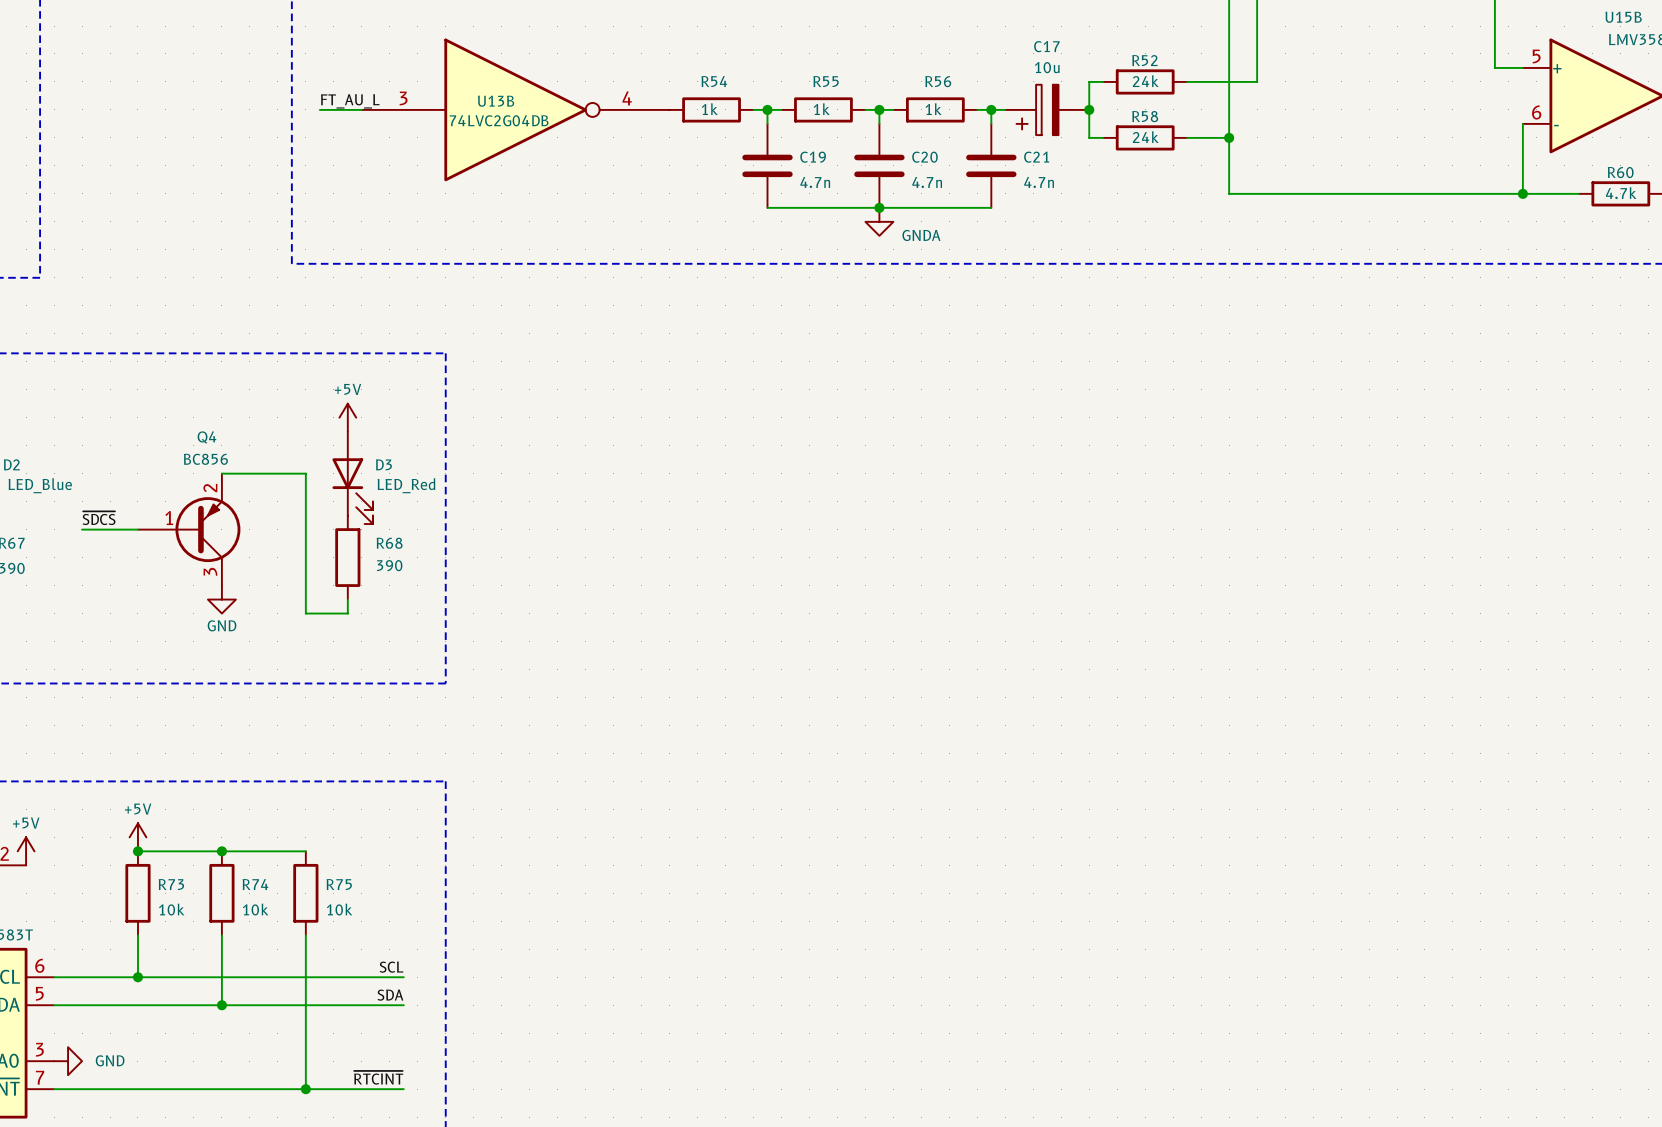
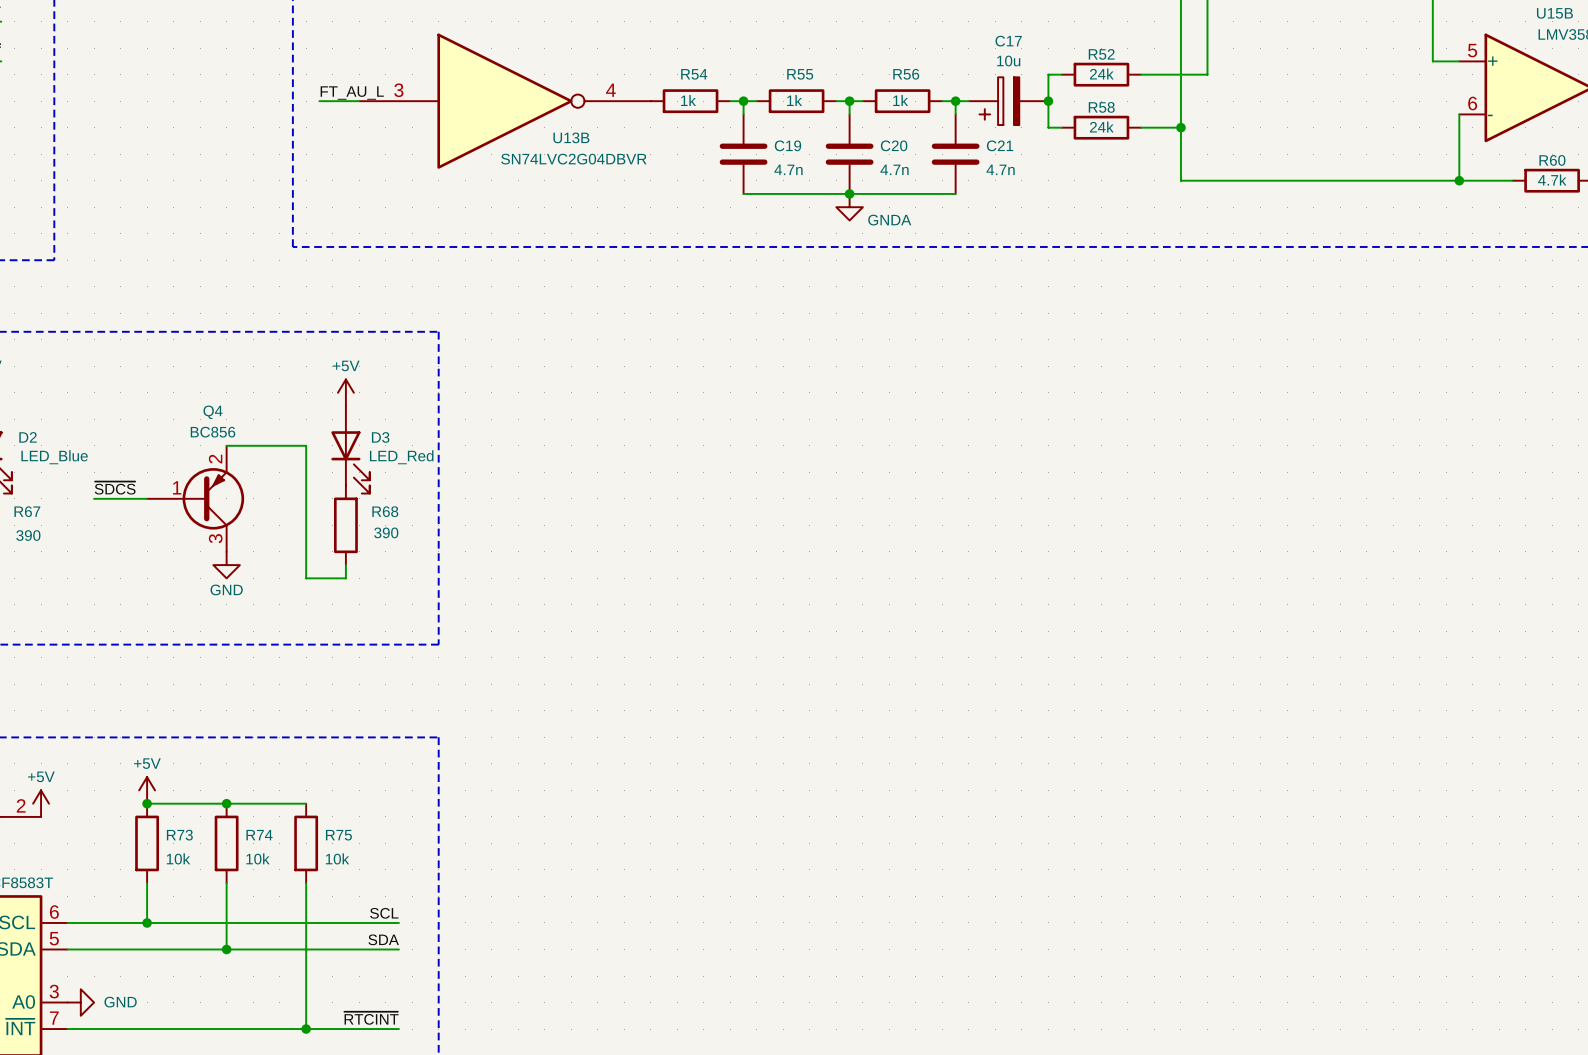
U13B name position: U13B (496, 101) -> U13B (571, 137)
U13B value: 74LVC2G04DB (499, 120) -> SN74LVC2G04DBVR (573, 159)

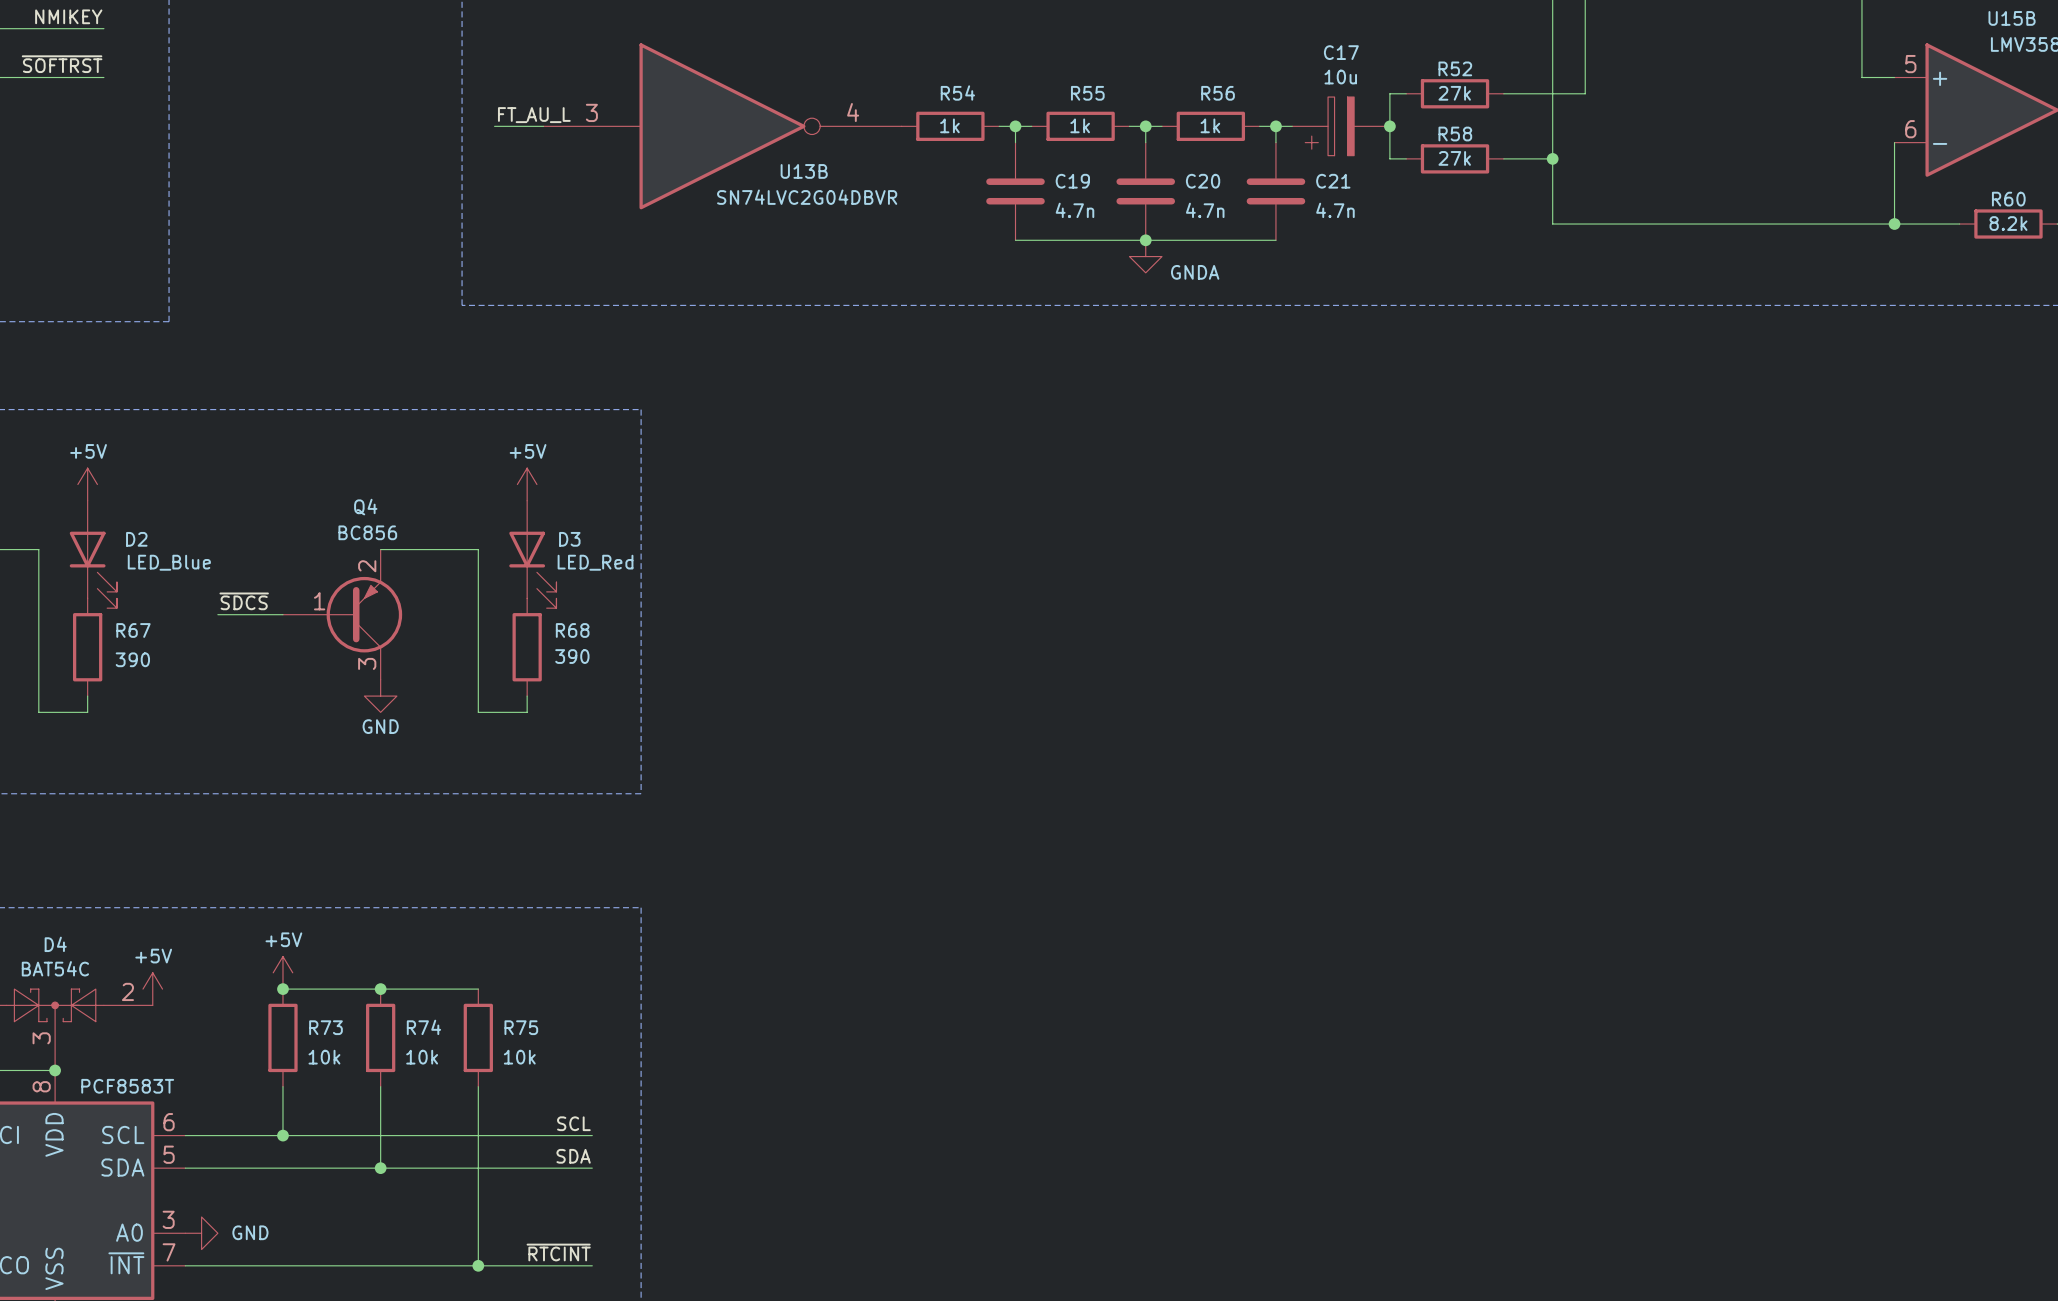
R52 value: 24k (1101, 73) -> 27k (1454, 93)
R58 value: 24k (1101, 127) -> 27k (1454, 158)
R60 value: 4.7k (1552, 180) -> 8.2k (2008, 223)

